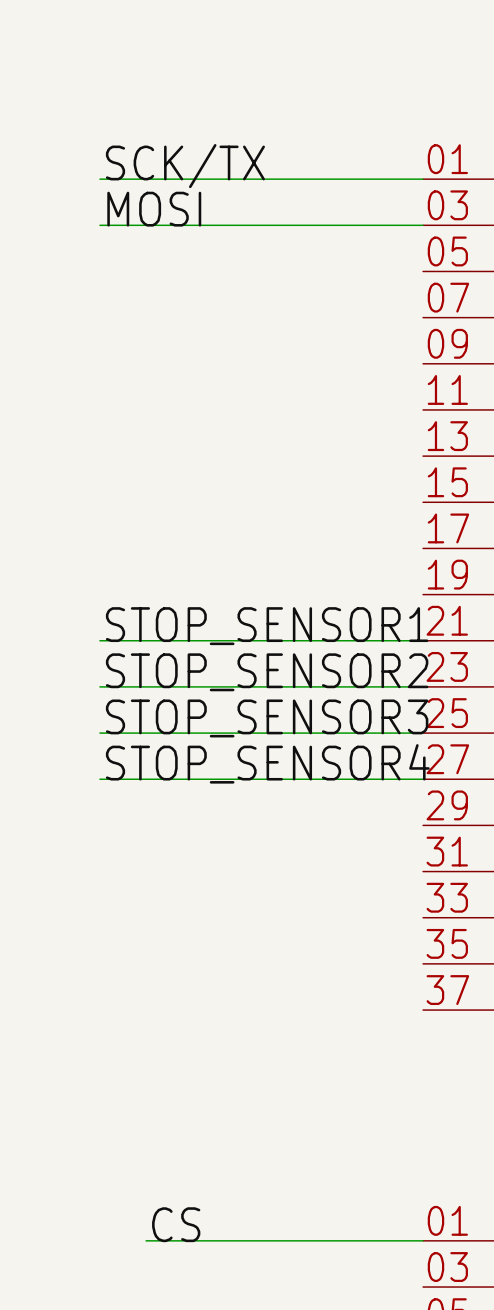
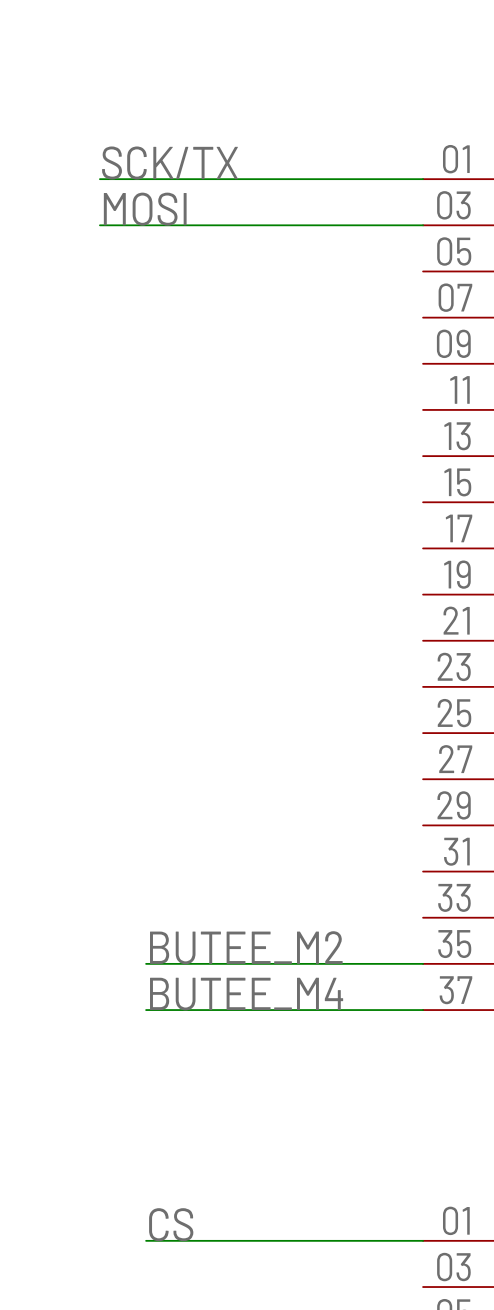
label: STOP_SENSOR1 (267, 626) -> none
wire: (99, 640) (423, 640) -> none
label: STOP_SENSOR2 (267, 672) -> none
wire: (99, 686) (423, 686) -> none
label: STOP_SENSOR3 (267, 718) -> none
wire: (99, 733) (423, 733) -> none
label: STOP_SENSOR4 (267, 763) -> none
wire: (99, 779) (423, 779) -> none
label: none -> BUTEE_M2 (246, 947)
wire: none -> (146, 963) (423, 963)
label: none -> BUTEE_M4 (246, 994)
wire: none -> (146, 1010) (423, 1010)

